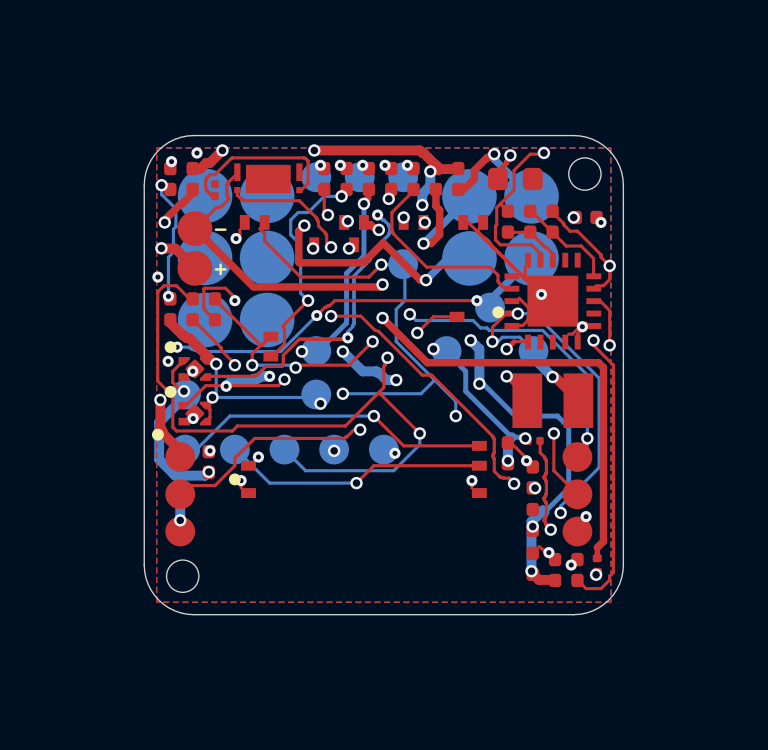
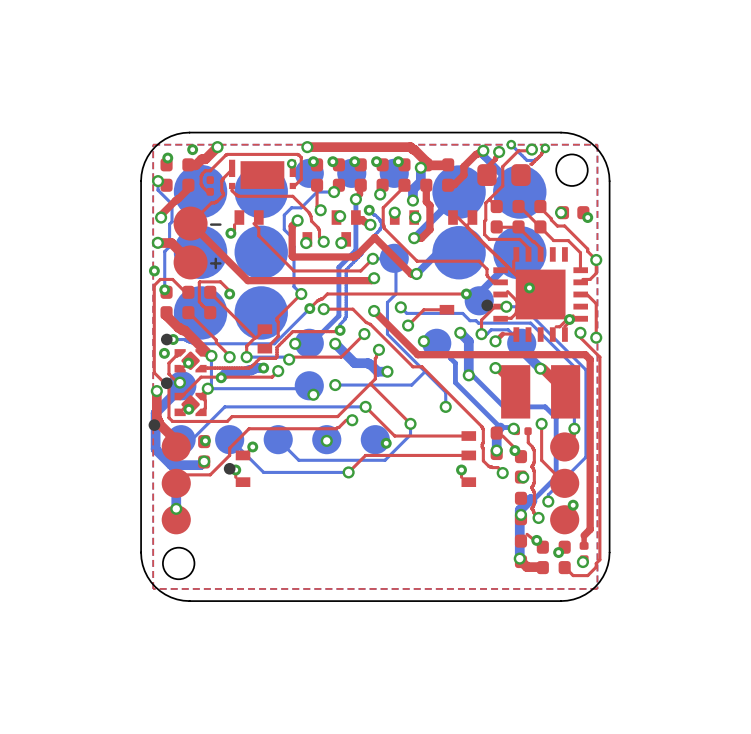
bottom track: none -> (511, 144) (527, 160) (536, 159) (545, 148)
via: none -> (511, 144)
top track: none -> (545, 148) (530, 164)
via: none -> (545, 148)
via: none -> (291, 163)

